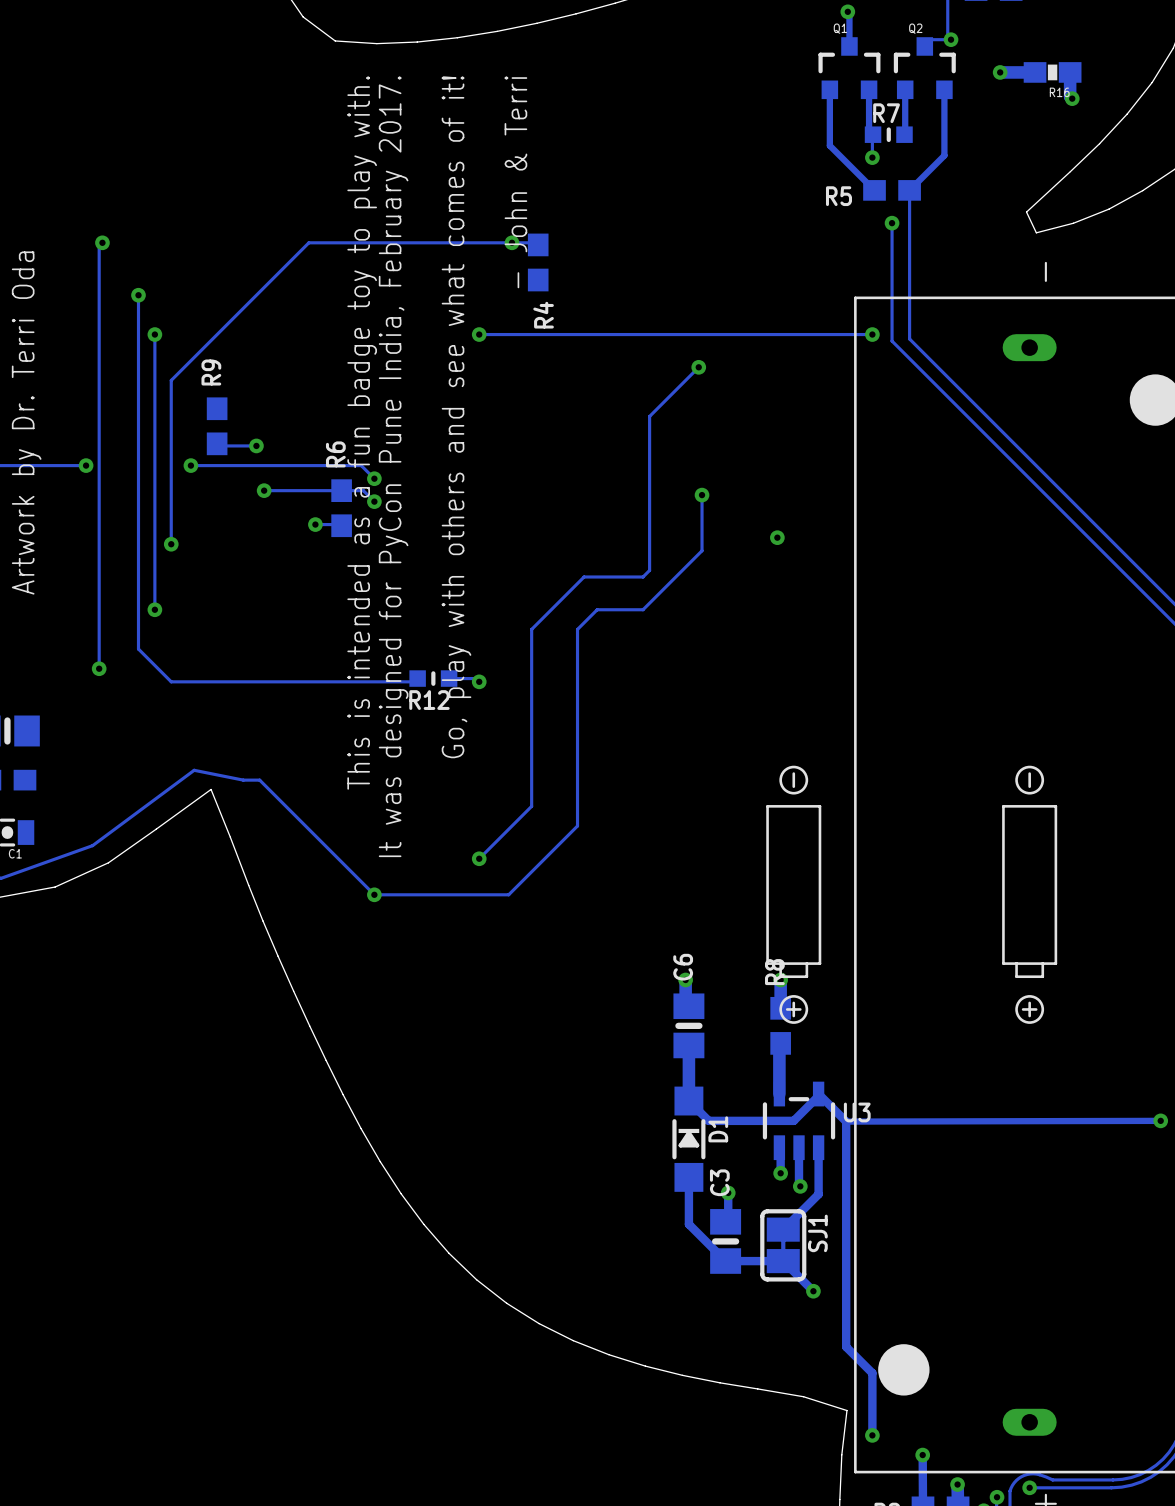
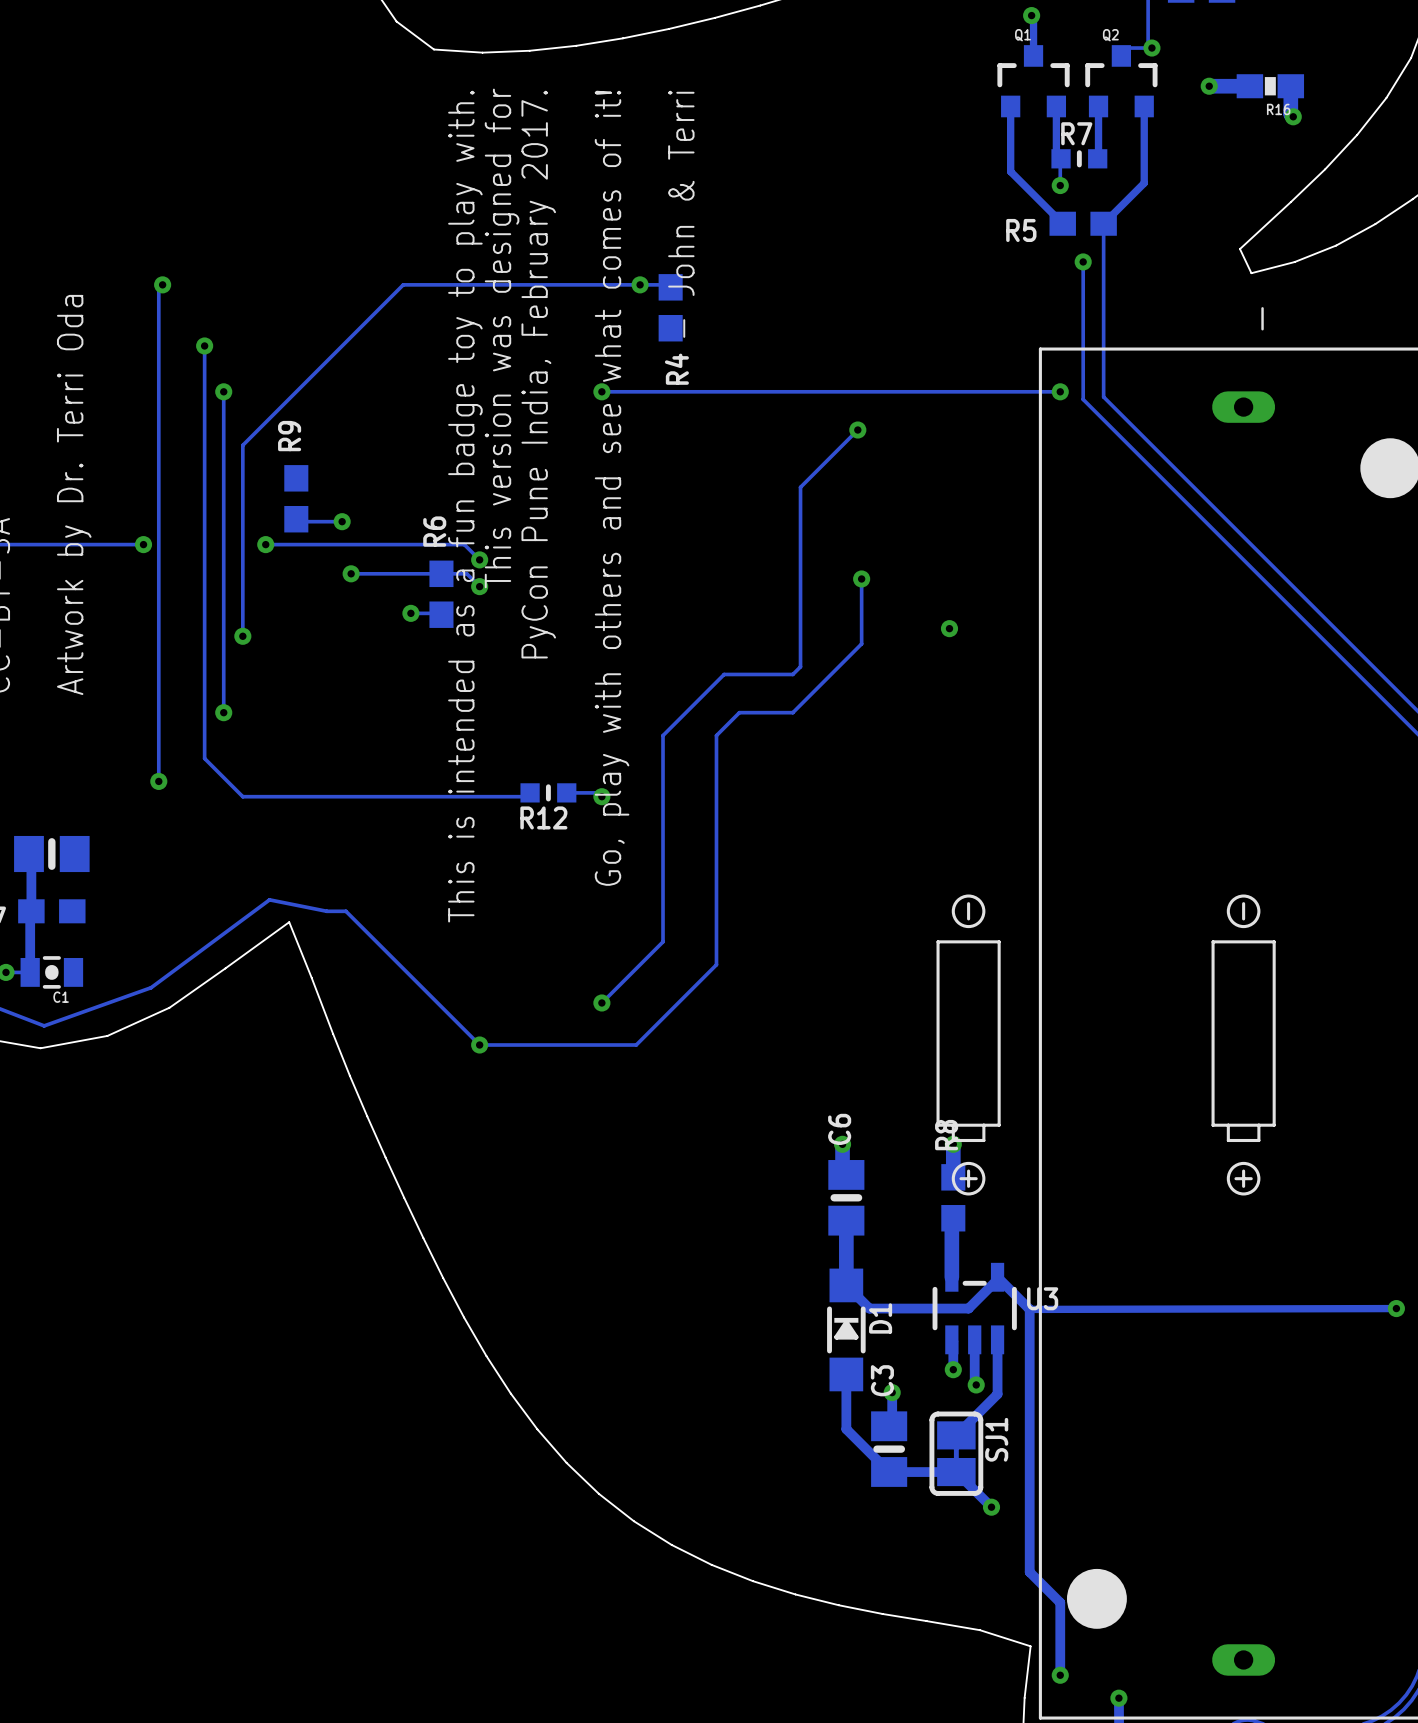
text position: - John & Terri (515, 182) -> - John & Terri (681, 214)
text: none -> PyCon Pune India, February 2017. (538, 374)
text position: Go, play with others and see what comes of it! (456, 417) -> Go, play with others and see what comes of it! (612, 488)
text: It was designed for PyCon Pune India, February 2017. (393, 466) -> This version was designed for (502, 338)

